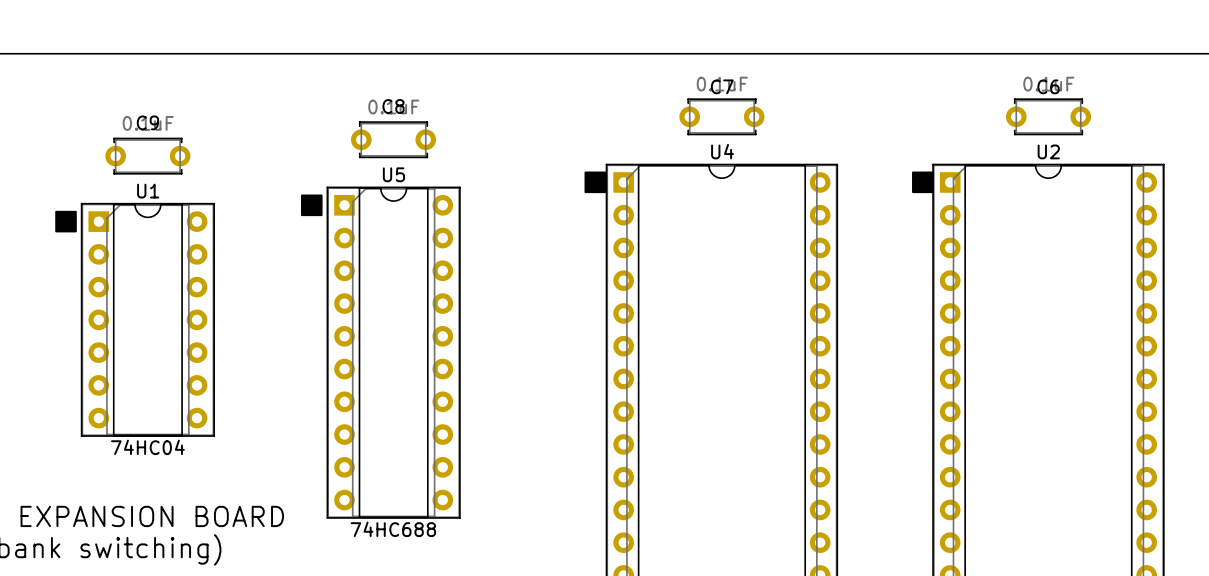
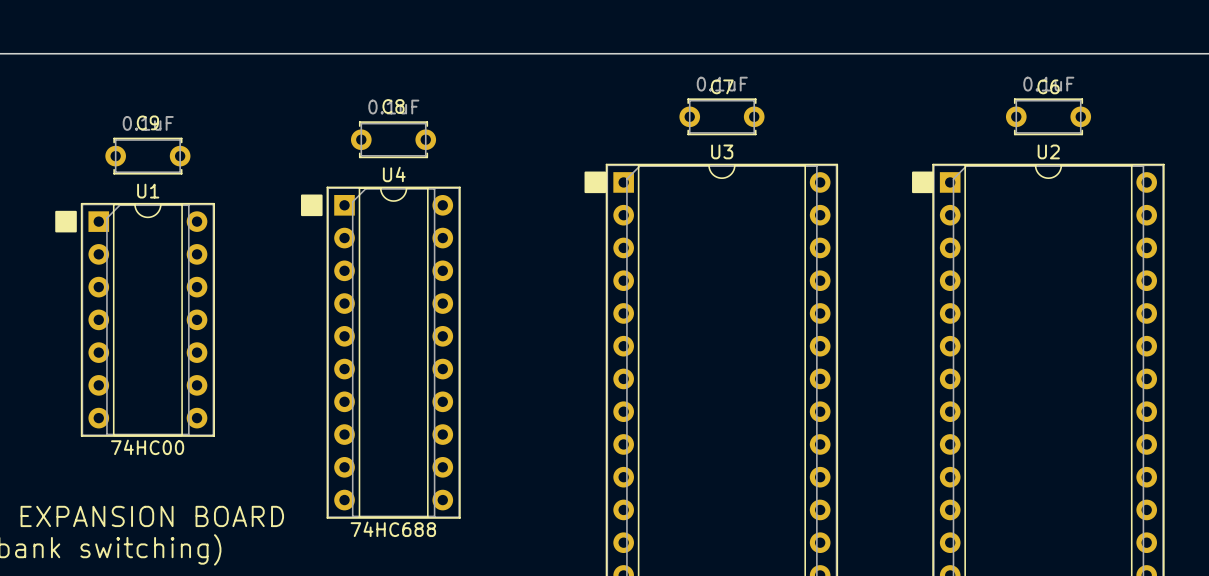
U4 name: U4 (722, 151) -> U3 (722, 151)
U5 name: U5 (393, 174) -> U4 (394, 174)
U1 value: 74HC04 (147, 447) -> 74HC00 (147, 447)

